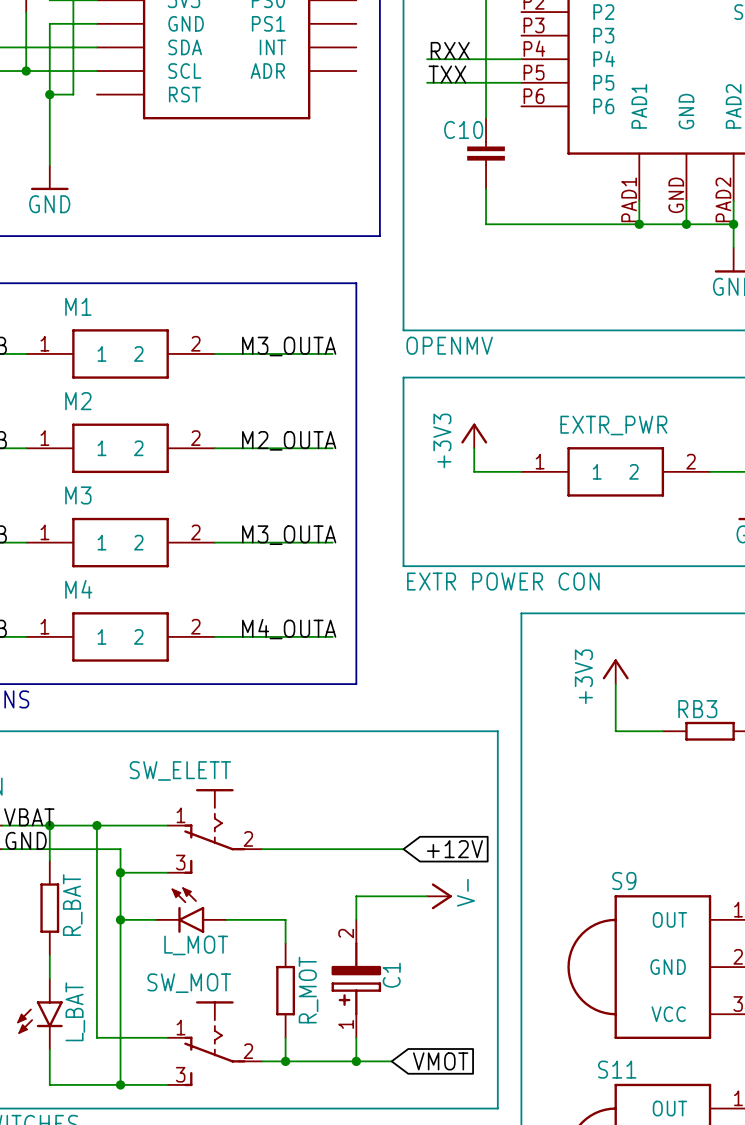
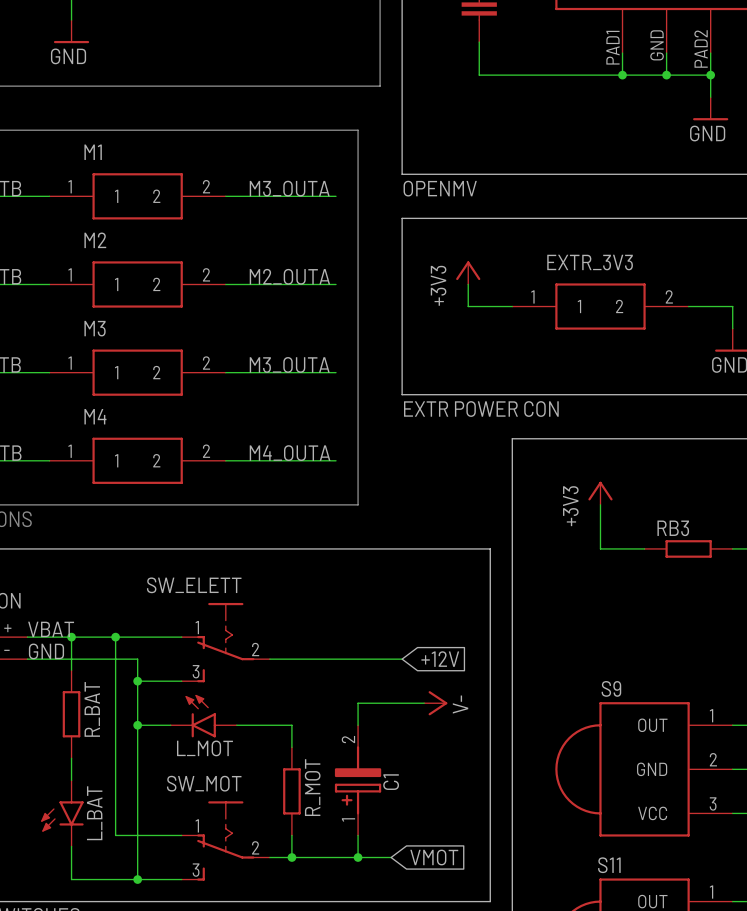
EXTR_PWR name: EXTR_PWR (613, 425) -> EXTR_3V3 (590, 262)

